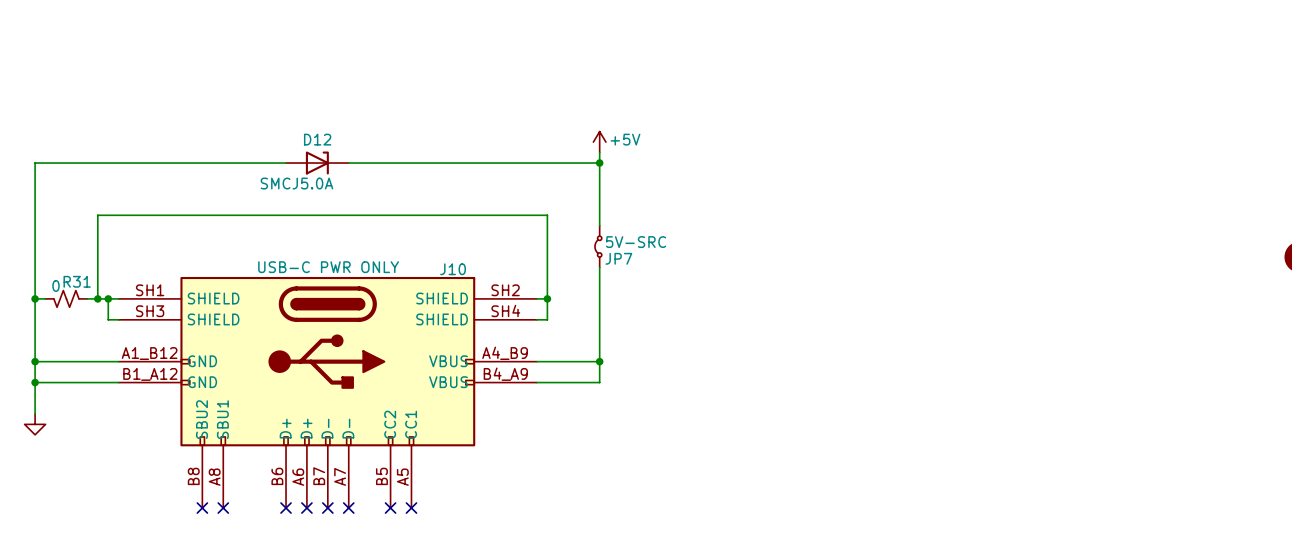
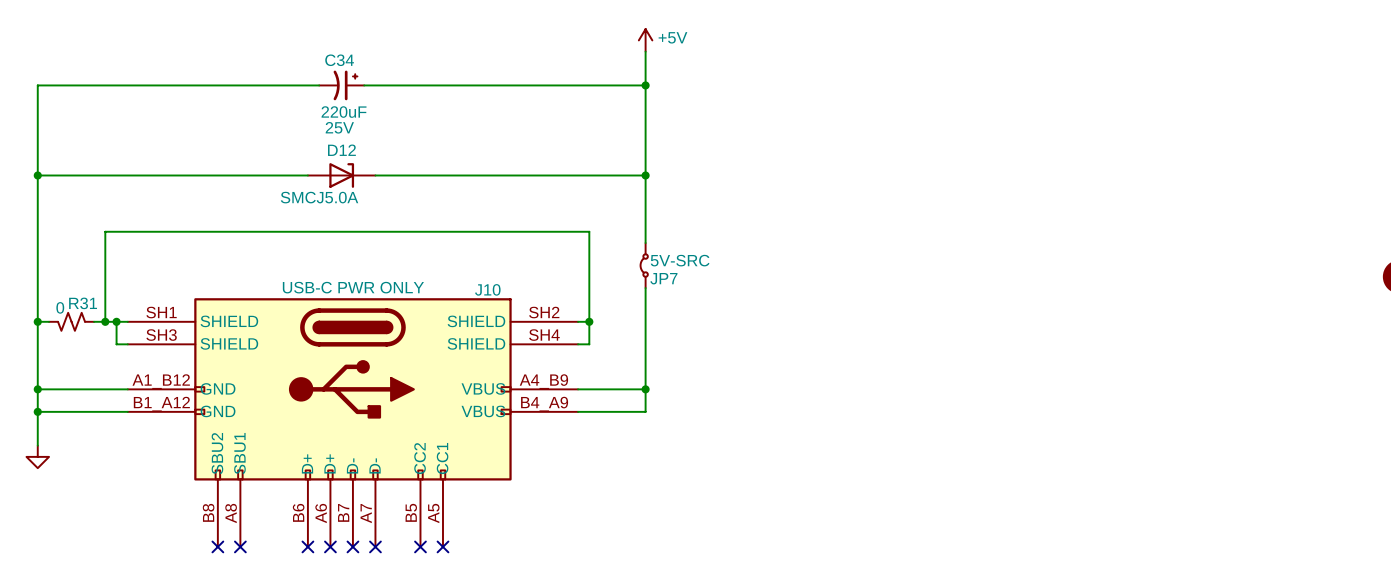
wire: none -> (645, 51) (645, 164)
wire: none -> (319, 85) (37, 85) (37, 175)
C34: none -> 220uF (341, 85)
wire: none -> (364, 85) (645, 85)
junction: none -> (645, 85)
power symbol position: +5V (599, 142) -> +5V (645, 40)
junction: none -> (37, 175)

